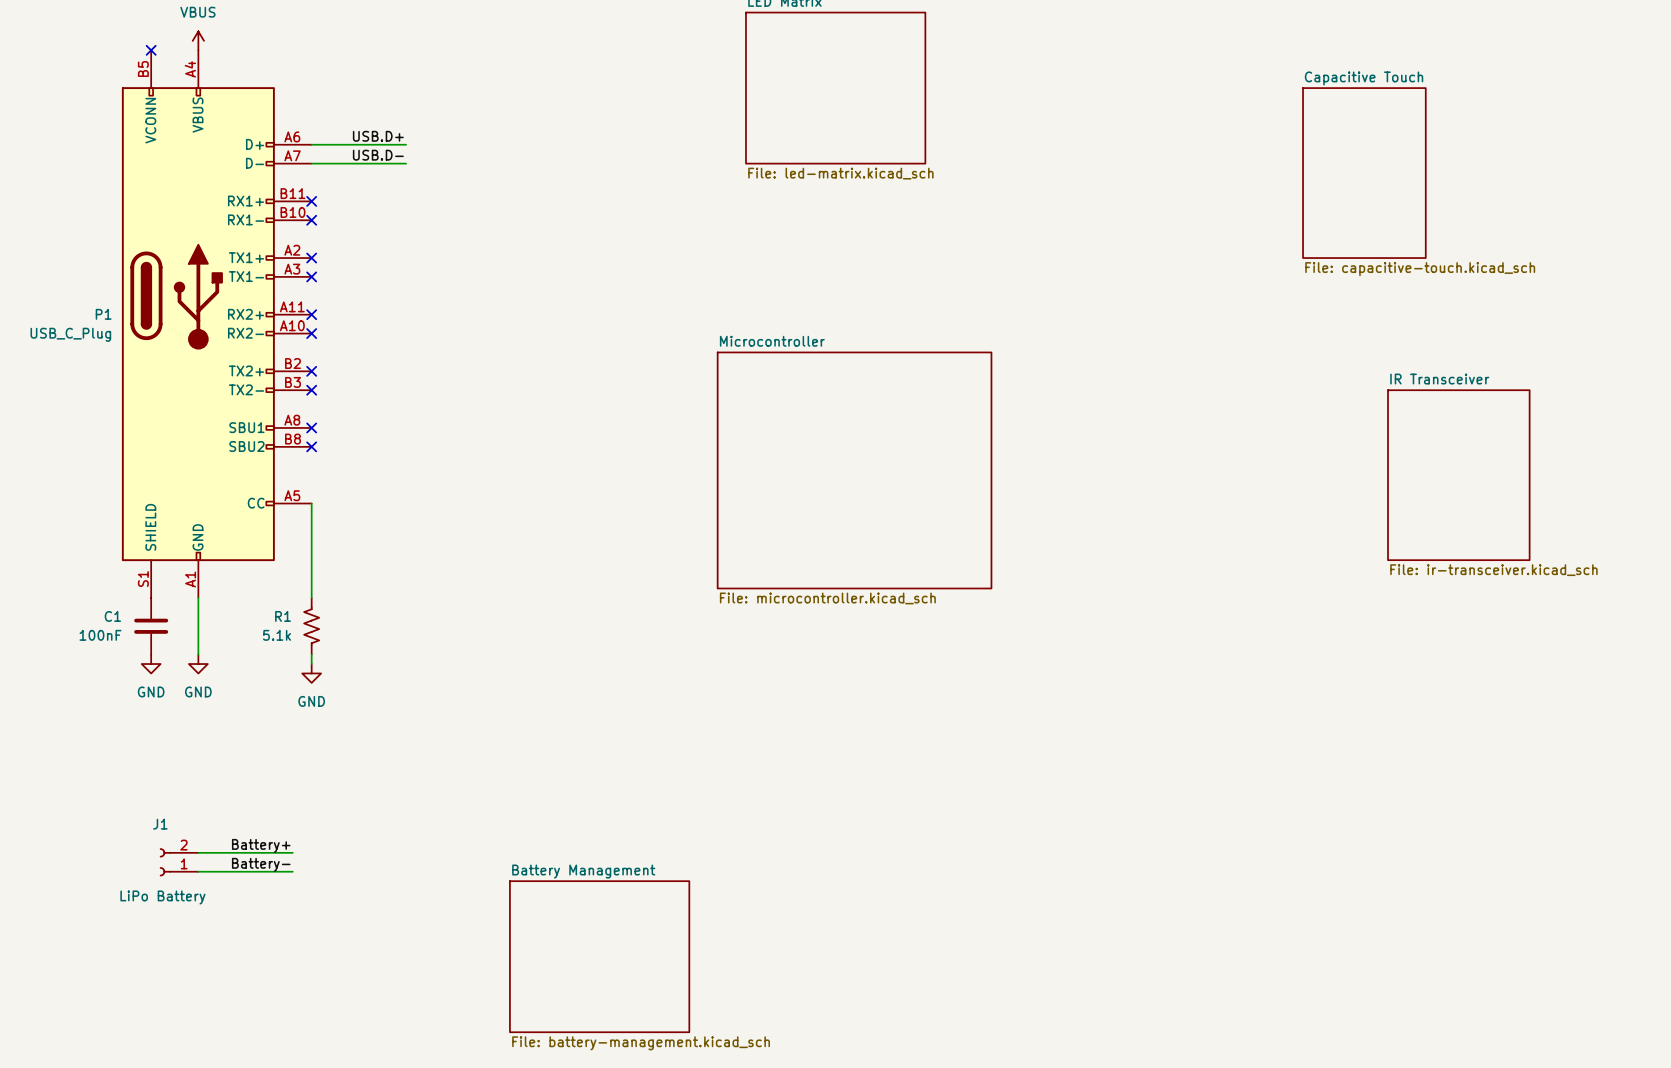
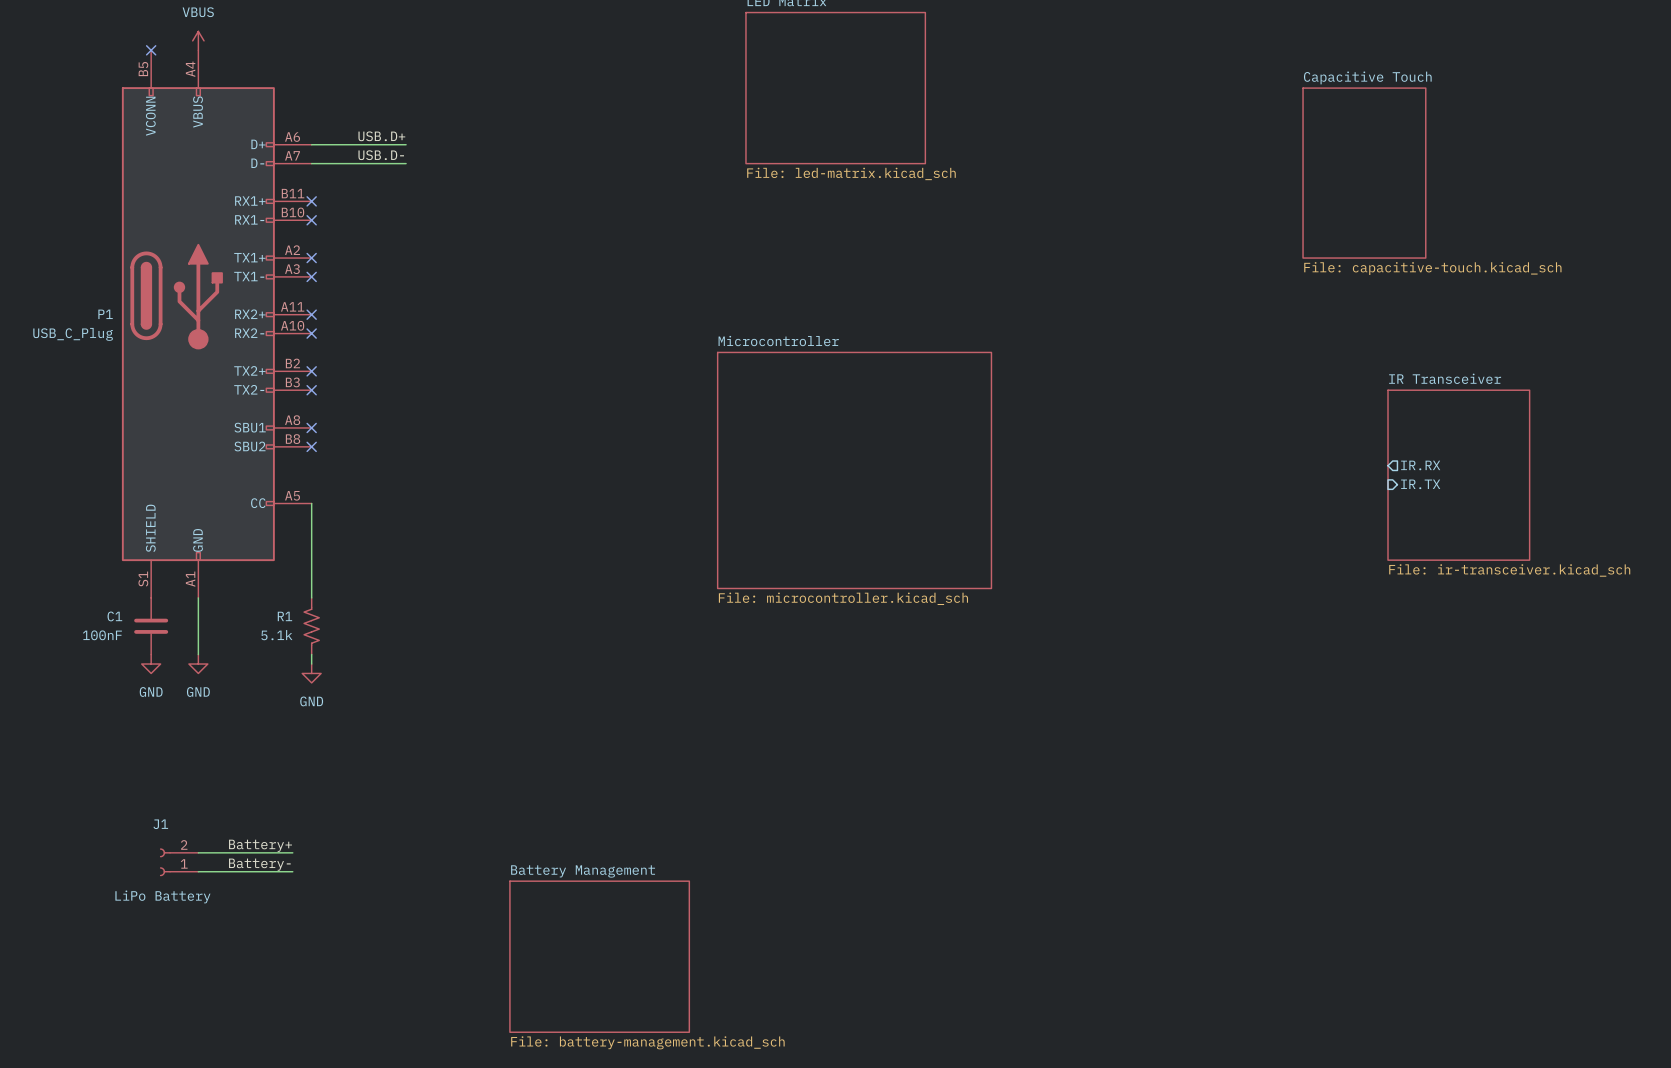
sheet pin: none -> IR.RX (1420, 465)
sheet pin: none -> IR.TX (1420, 484)

